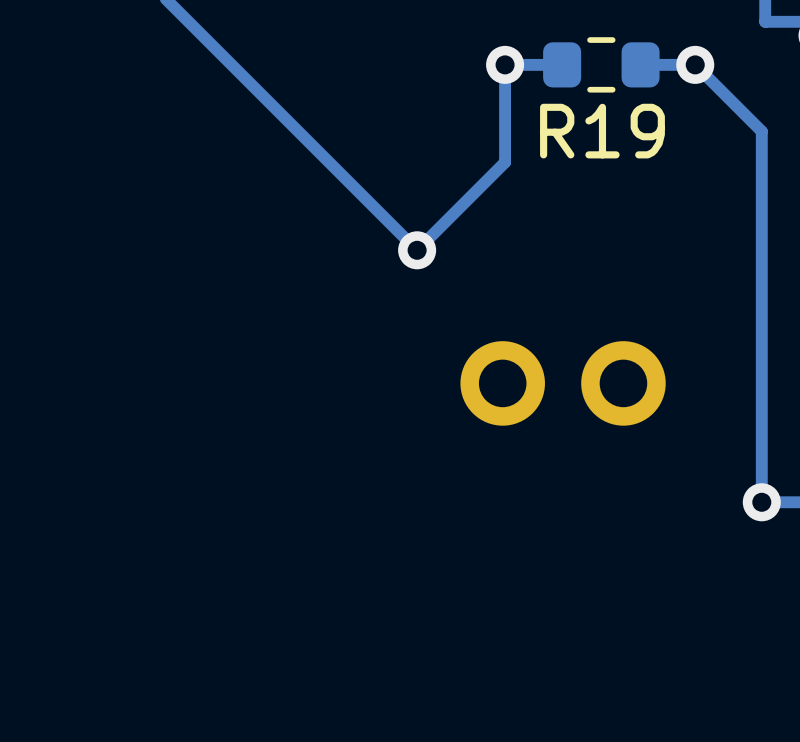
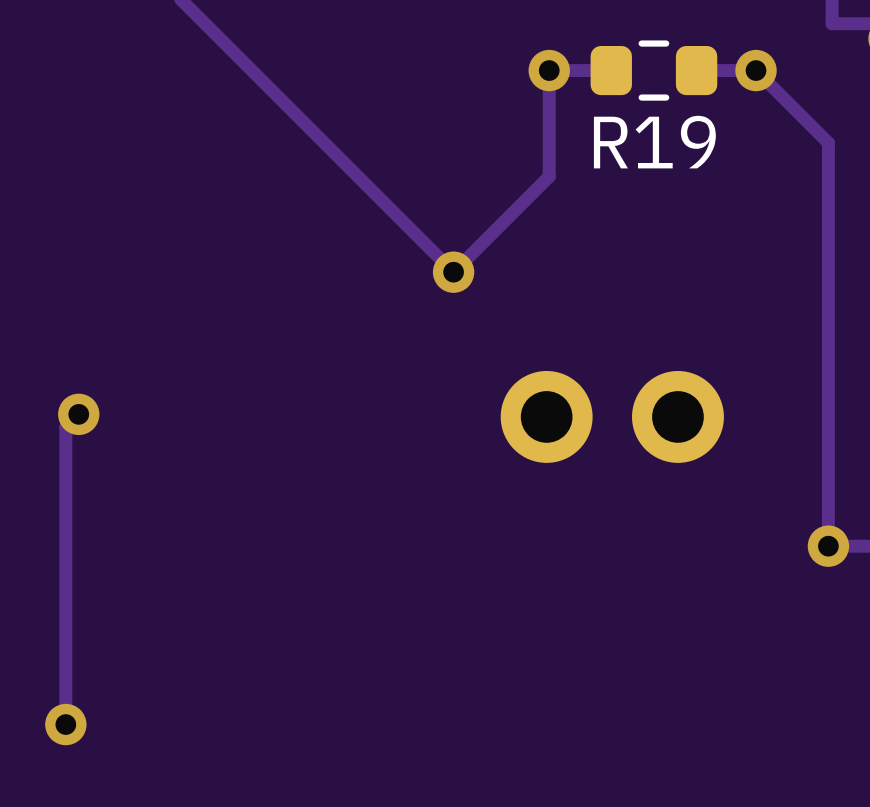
track: none -> (78, 414) (65, 427) (65, 724)
via: none -> (78, 414)
via: none -> (65, 724)

